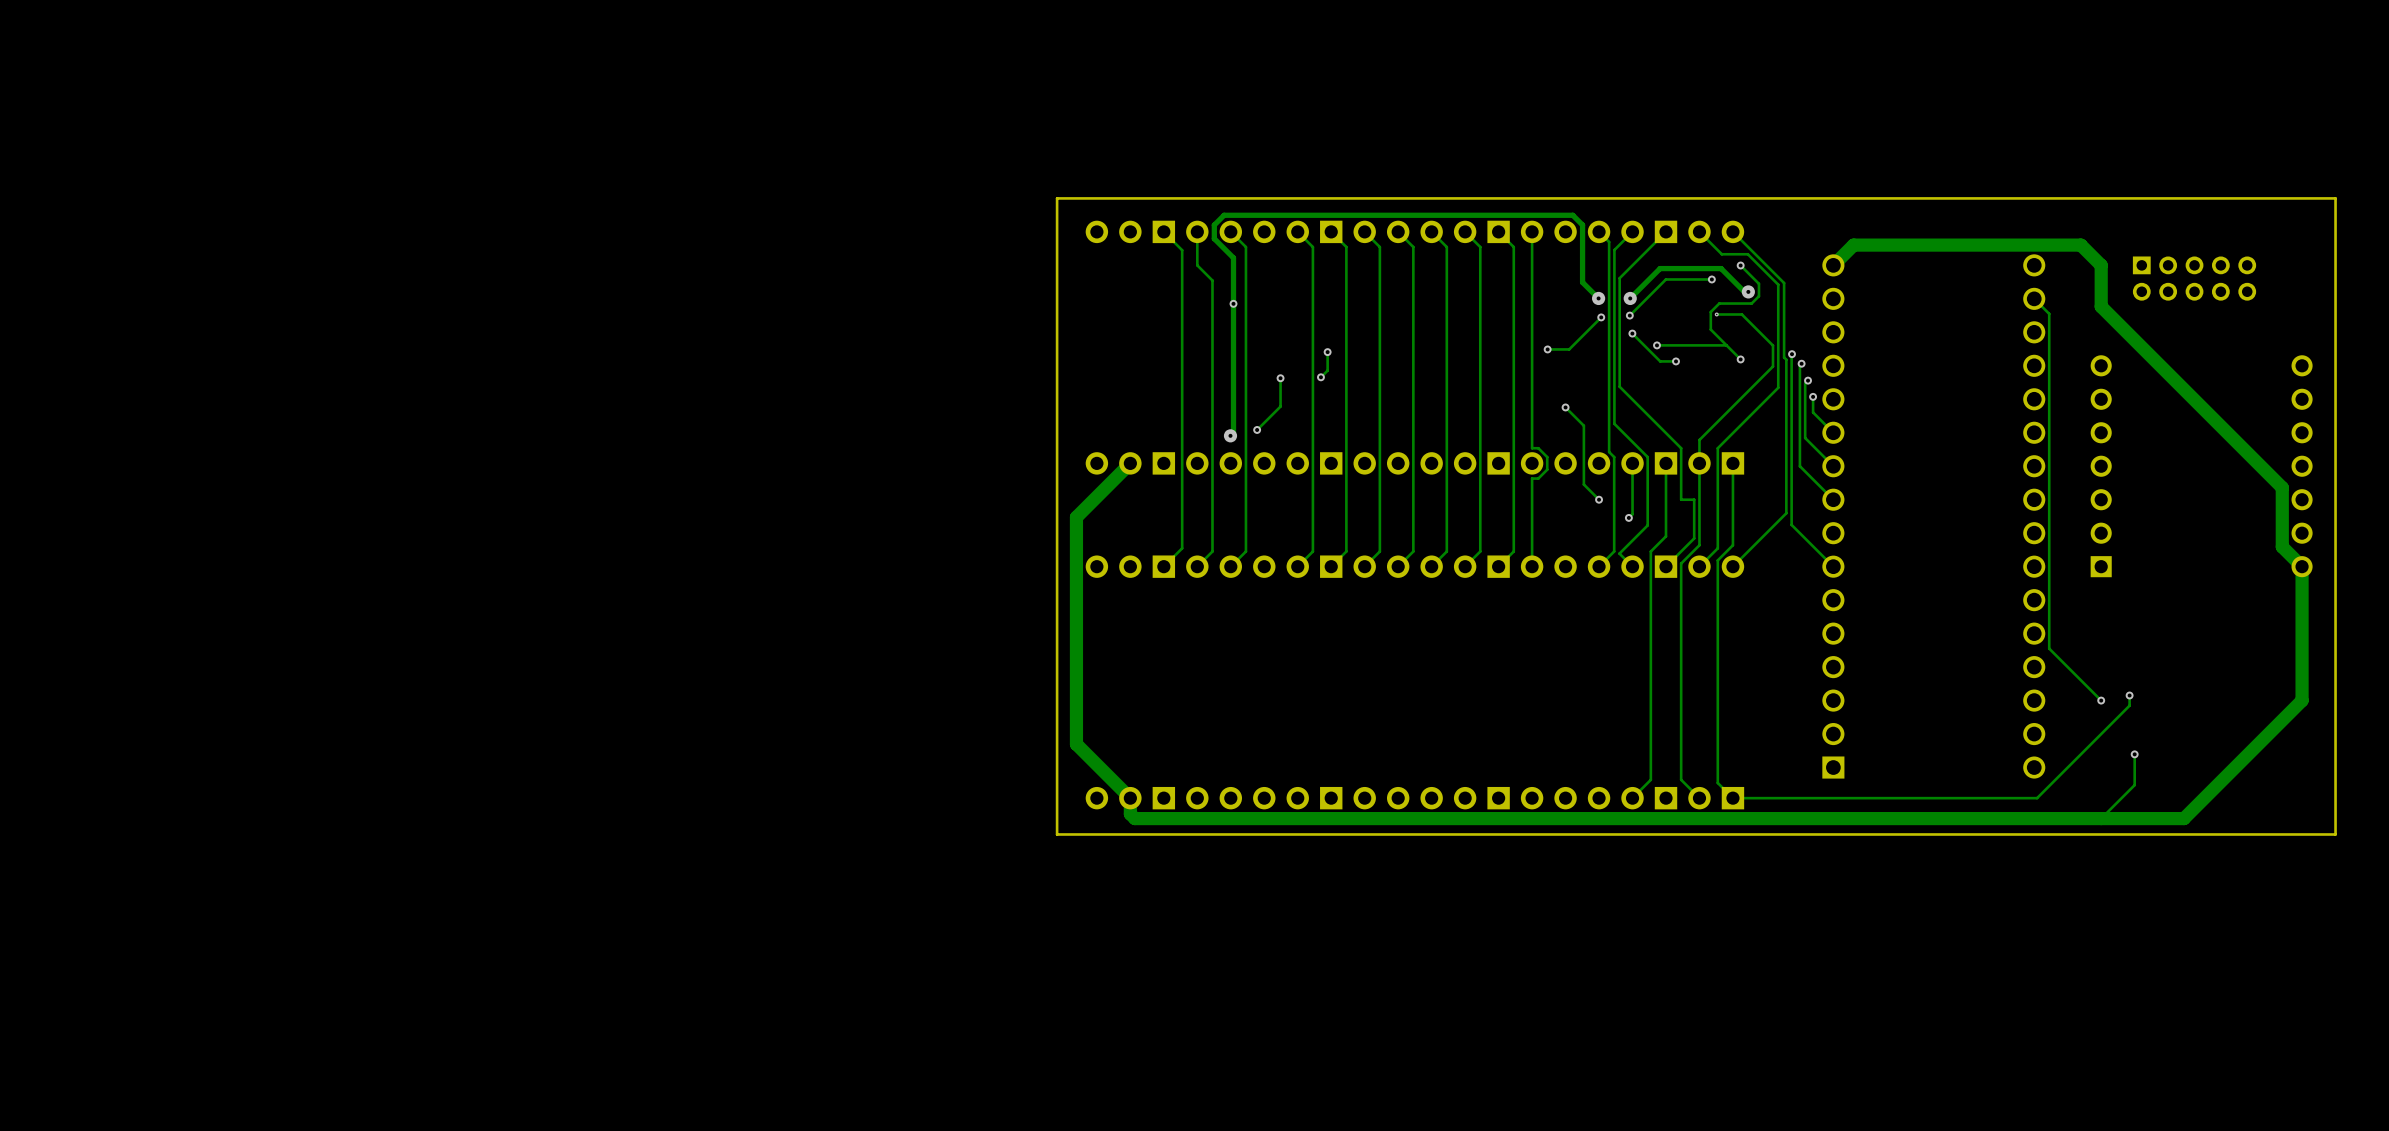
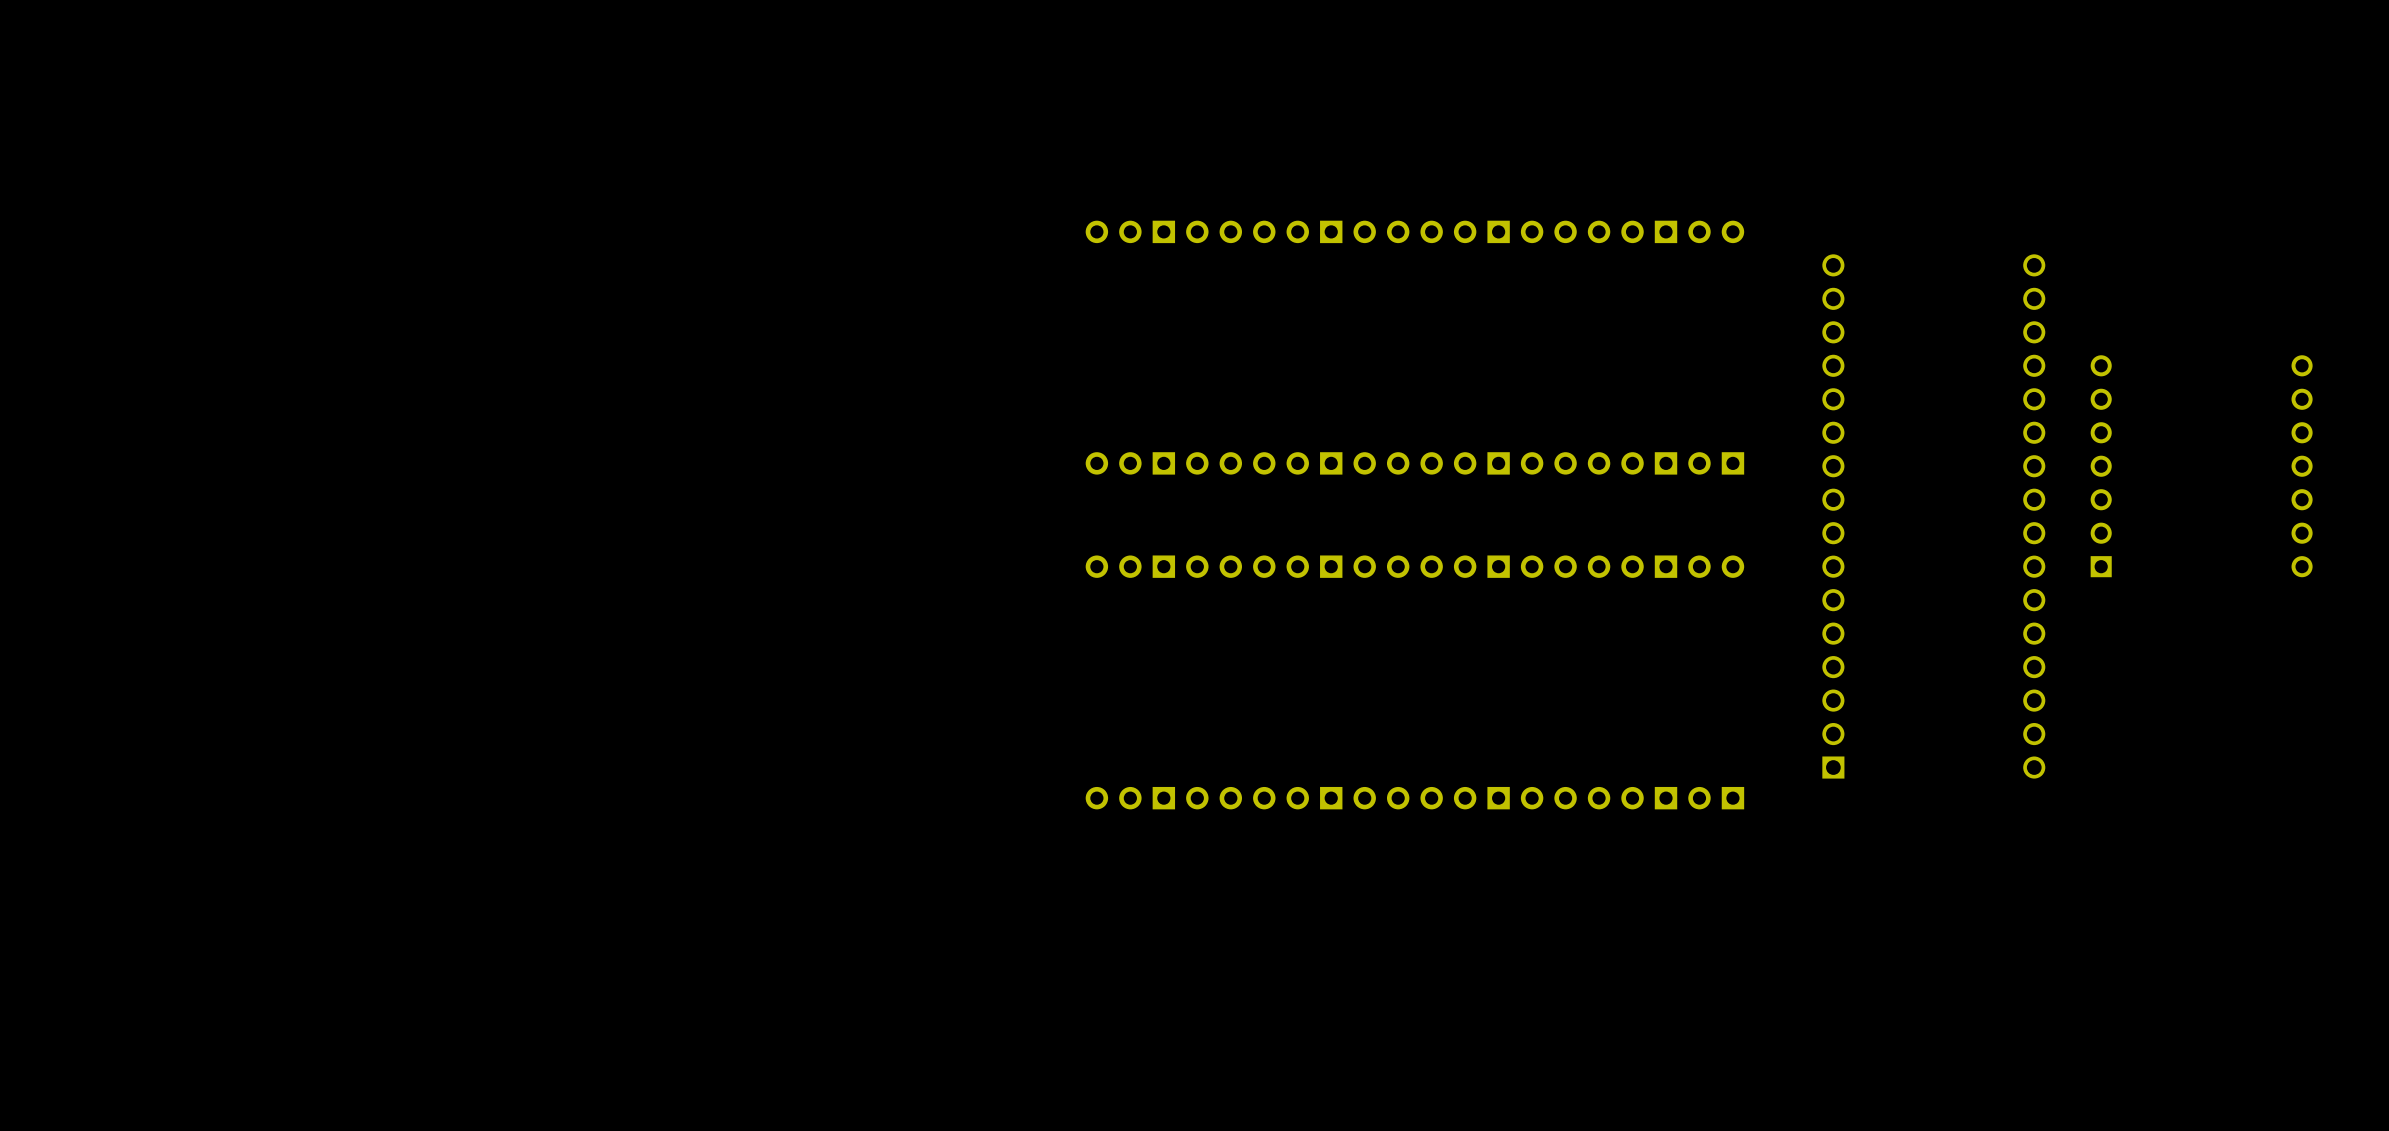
board edge: (2335, 198) (2335, 834) (1057, 834) (1057, 198) (2335, 198) -> none
track: (1163, 231) (1182, 250) (1182, 548) (1163, 566) -> none
track: (1197, 231) (1197, 265) (1212, 280) (1212, 551) (1197, 566) -> none
track: (1230, 231) (1245, 247) (1245, 551) (1230, 566) -> none
track: (1297, 231) (1312, 247) (1312, 551) (1297, 566) -> none
track: (1331, 231) (1346, 247) (1346, 551) (1331, 566) -> none
track: (1364, 231) (1379, 247) (1379, 551) (1364, 566) -> none
track: (1398, 231) (1413, 247) (1413, 551) (1398, 566) -> none
track: (1431, 231) (1446, 247) (1446, 551) (1431, 566) -> none
track: (1465, 231) (1480, 247) (1480, 551) (1465, 566) -> none
track: (1498, 231) (1513, 247) (1513, 551) (1498, 566) -> none
track: (1532, 231) (1532, 448) (1538, 448) (1547, 457) (1547, 469) (1538, 478) (1532, 478) (1532, 566) -> none
track: (1599, 231) (1609, 241) (1609, 452) (1614, 457) (1614, 551) (1599, 566) -> none
track: (1632, 231) (1614, 250) (1614, 423) (1647, 457) (1647, 525) (1619, 553) (1632, 566) -> none
track: (1666, 231) (1619, 278) (1619, 386) (1681, 448) (1681, 499) (1694, 499) (1694, 538) (1666, 566) -> none
track: (1699, 231) (1721, 254) (1747, 254) (1778, 284) (1778, 387) (1717, 448) (1717, 548) (1699, 566) -> none
track: (1732, 231) (1784, 283) (1784, 357) (1786, 359) (1786, 513) (1732, 566) -> none
track: (1740, 265) (1758, 283) (1758, 296) (1751, 303) (1719, 303) (1710, 312) (1710, 329) (1740, 359) -> none
via: (1740, 265) -> none
track: (1833, 265) (1853, 245) (2080, 245) (2101, 265) (2101, 306) (2282, 487) (2282, 546) (2302, 566) (2302, 700) (2184, 818) (1134, 818) (1130, 814) (1130, 798) (1076, 744) (1076, 517) (1130, 463) -> none
part: (2194, 278) -> none
track: (1711, 279) (1665, 279) (1629, 315) -> none
via: (1711, 279) -> none
track: (1748, 291) (1744, 291) (1721, 268) (1660, 268) (1630, 298) -> none
via: (1748, 291) -> none
track: (1598, 298) (1582, 282) (1582, 225) (1572, 215) (1224, 215) (1214, 225) (1214, 238) (1233, 257) (1233, 432) (1230, 435) -> none
via: (1598, 298) -> none
via: (1630, 298) -> none
track: (2034, 298) (2049, 313) (2049, 648) (2101, 700) -> none
via: (1233, 303) -> none
track: (1716, 314) (1741, 314) (1773, 345) (1773, 366) (1699, 440) (1699, 545) (1681, 563) (1681, 779) (1699, 798) -> none
via: (1716, 314) -> none
via: (1629, 315) -> none
track: (1601, 317) (1569, 349) (1547, 349) -> none
via: (1601, 317) -> none
track: (1632, 333) (1660, 361) (1675, 361) -> none
via: (1632, 333) -> none
via: (1656, 345) -> none
track: (1726, 345) (1656, 345) -> none
via: (1547, 349) -> none
track: (1327, 352) (1327, 370) (1320, 377) -> none
via: (1327, 352) -> none
track: (1792, 354) (1791, 524) (1833, 566) -> none
via: (1792, 354) -> none
via: (1740, 359) -> none
via: (1675, 361) -> none
track: (1801, 363) (1799, 365) (1799, 466) (1833, 499) -> none
via: (1801, 363) -> none
via: (1320, 377) -> none
track: (1280, 378) (1280, 406) (1257, 429) -> none
via: (1280, 378) -> none
track: (1808, 380) (1805, 383) (1805, 438) (1833, 466) -> none
via: (1808, 380) -> none
track: (1813, 396) (1813, 412) (1833, 432) -> none
via: (1813, 396) -> none
track: (1565, 407) (1583, 425) (1583, 484) (1599, 499) -> none
via: (1565, 407) -> none
via: (1257, 429) -> none
via: (1230, 435) -> none
track: (1632, 463) (1632, 514) (1628, 517) -> none
track: (1666, 463) (1666, 536) (1650, 551) (1650, 779) (1632, 798) -> none
track: (1732, 463) (1732, 545) (1717, 560) (1717, 783) (1732, 798) -> none
via: (1599, 499) -> none
via: (1628, 517) -> none
track: (2129, 695) (2129, 705) (2037, 798) (1730, 798) -> none
via: (2129, 695) -> none
via: (2101, 700) -> none
track: (2134, 754) (2134, 785) (2101, 818) -> none
via: (2134, 754) -> none

